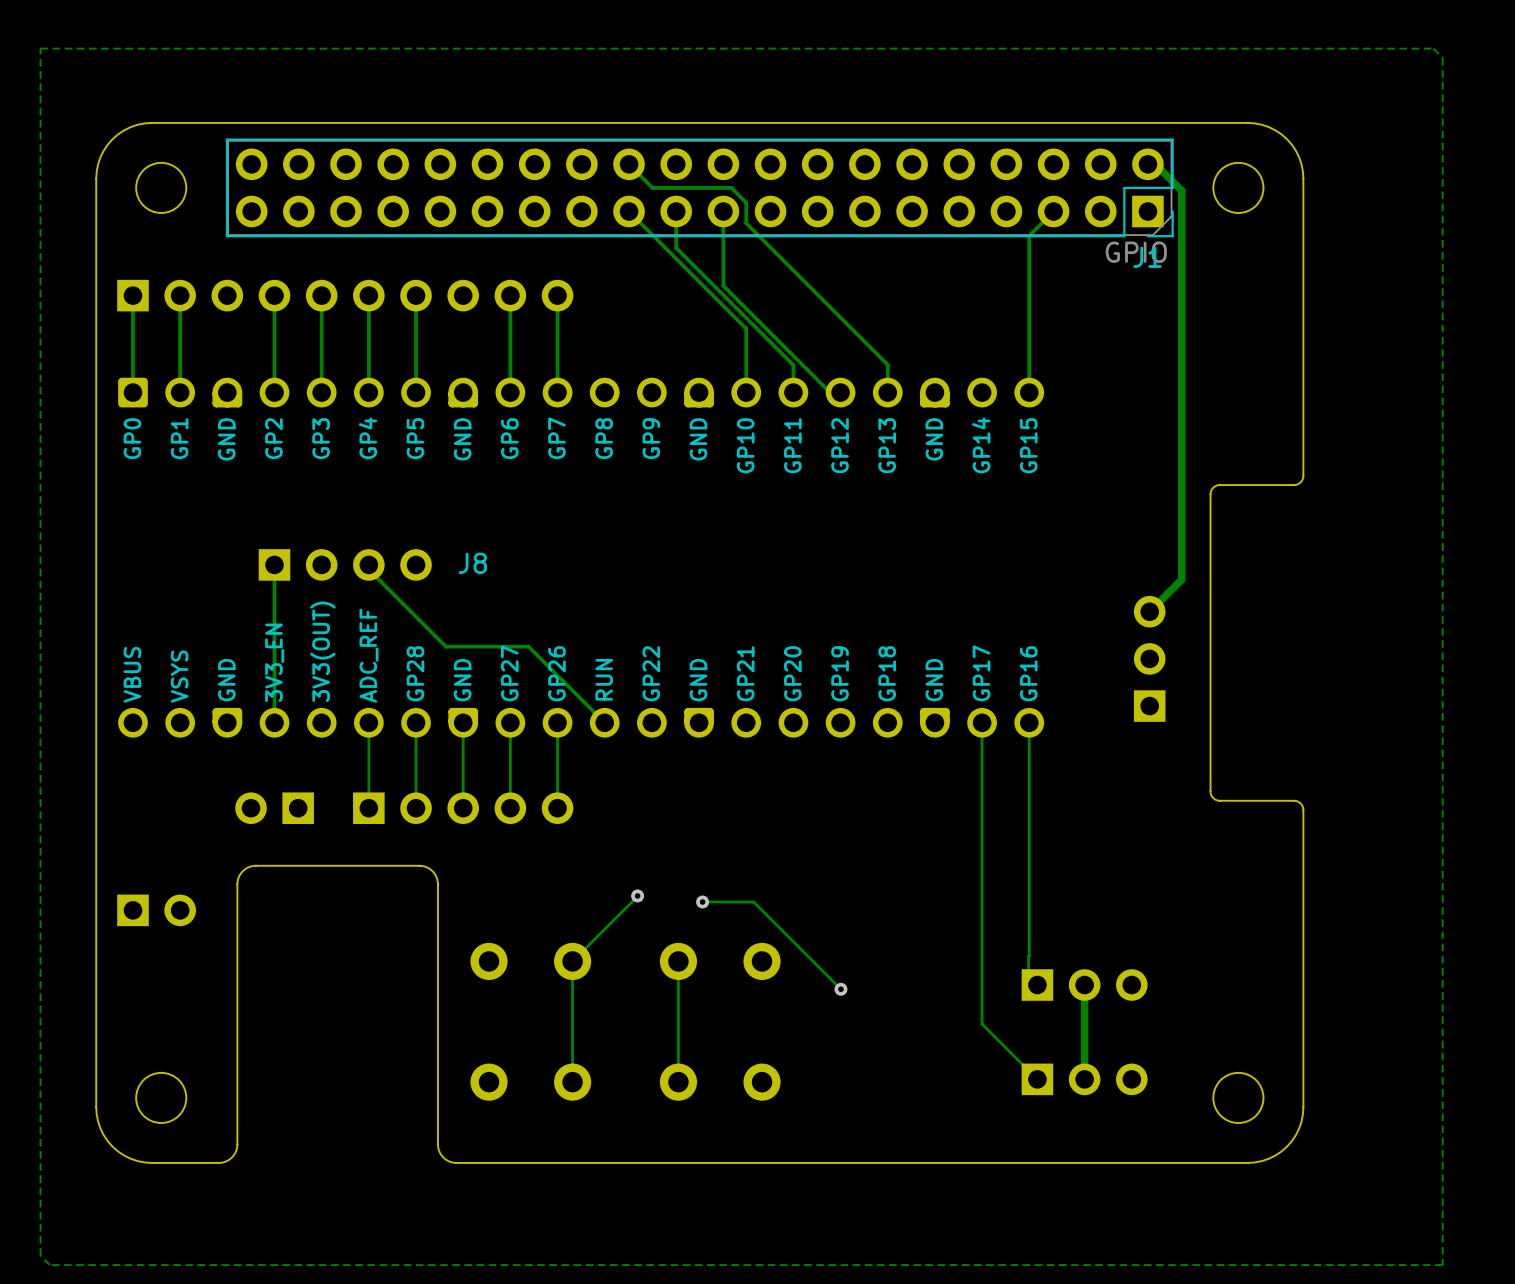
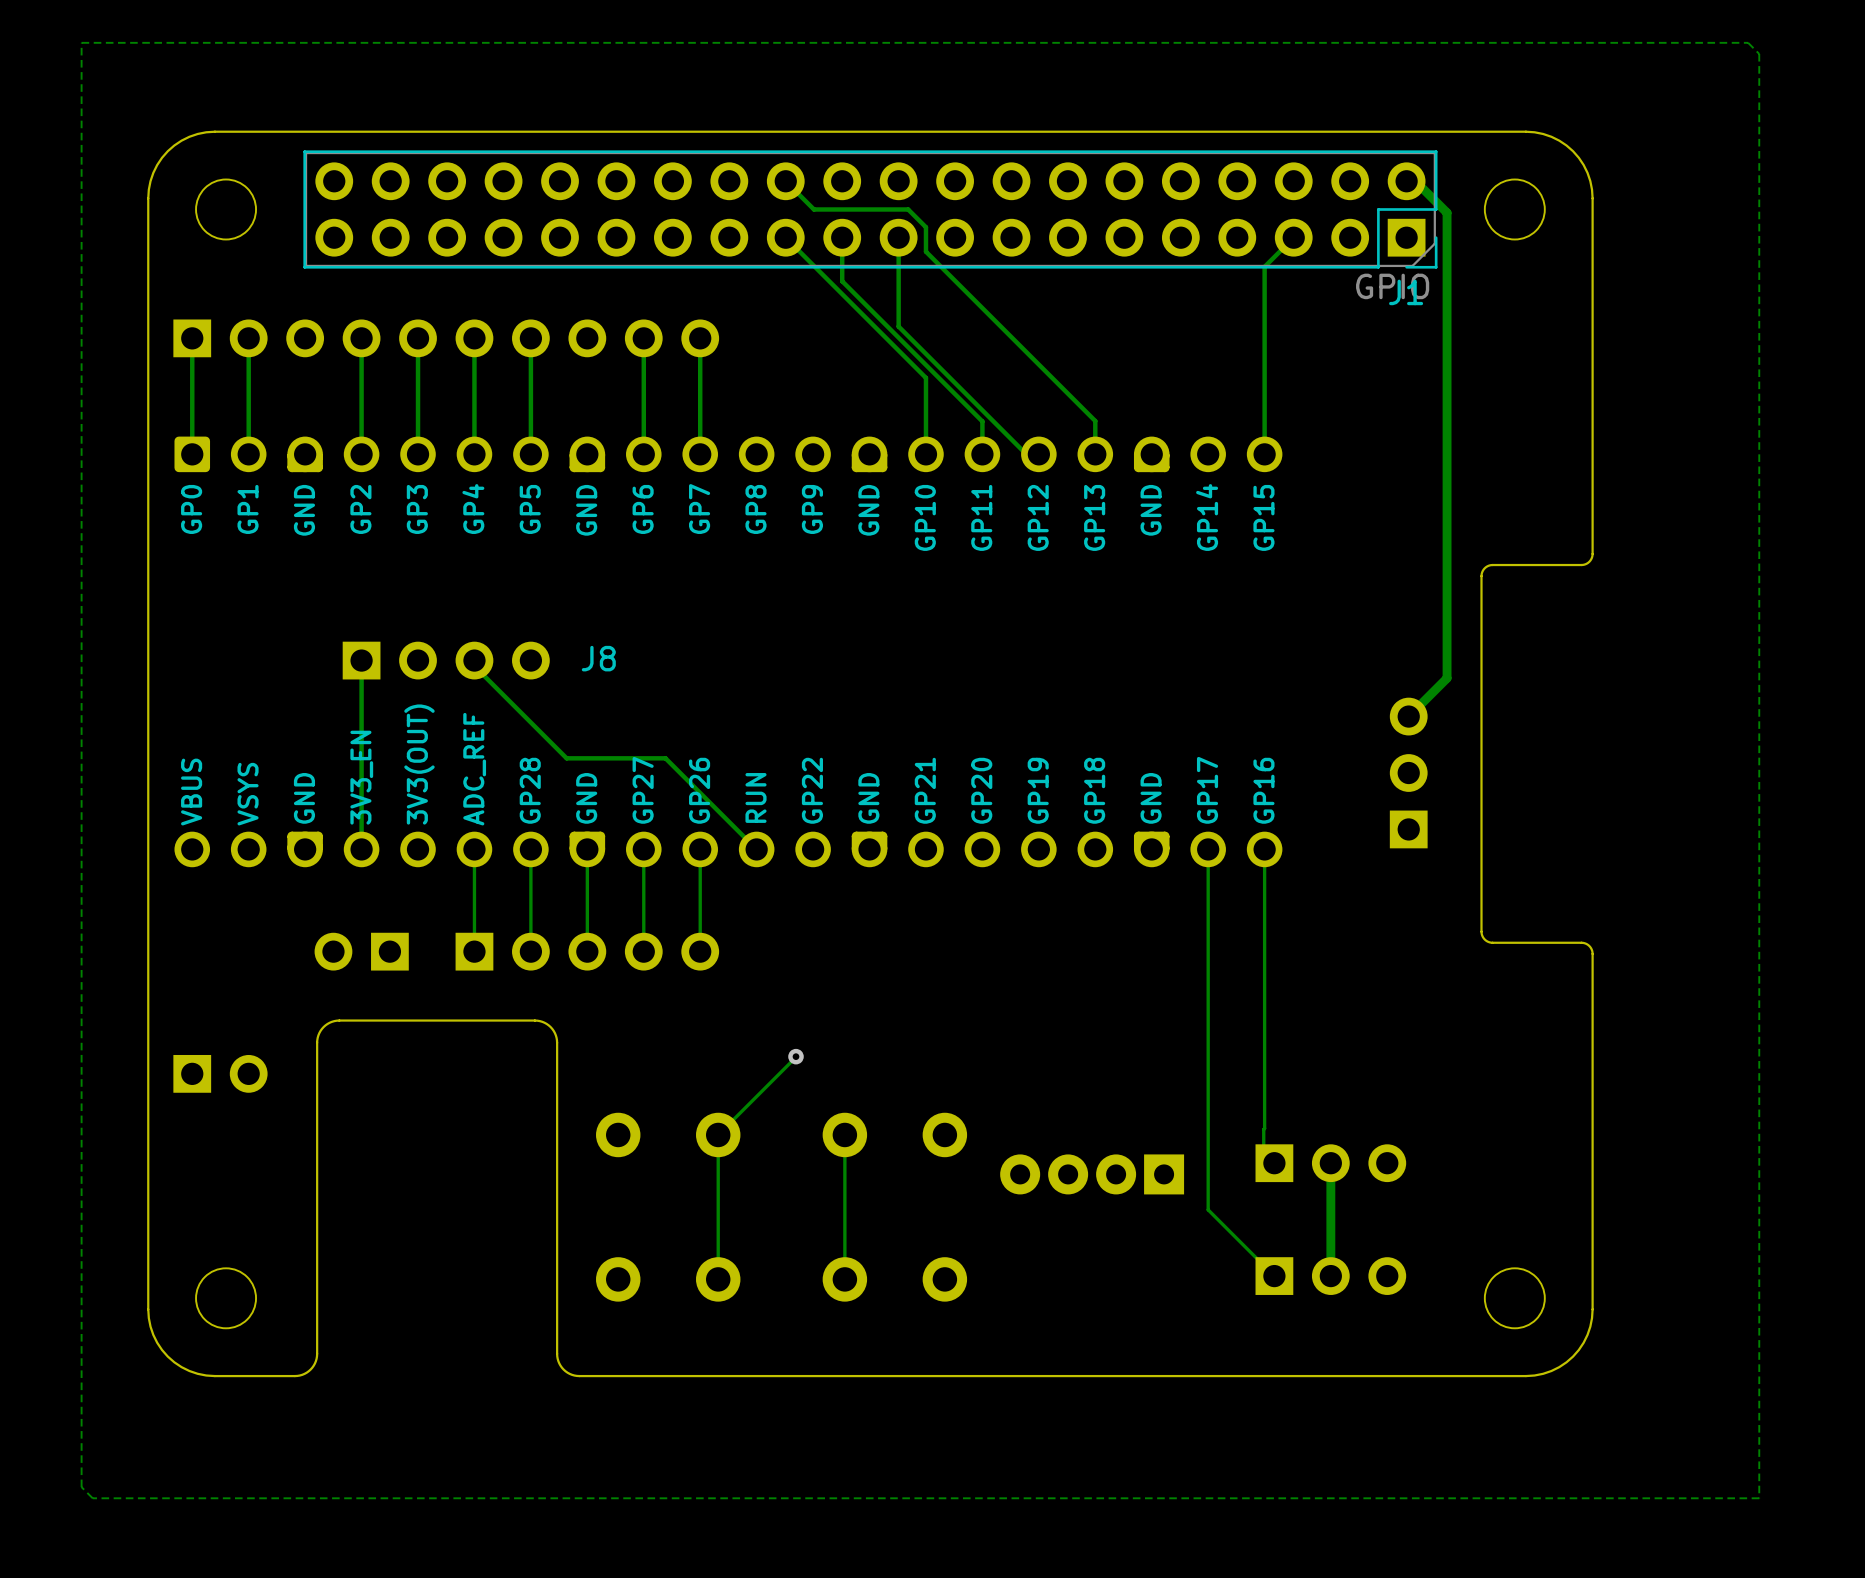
track: (702, 902) (753, 902) (840, 989) -> none
via: (702, 902) -> none
via: (840, 989) -> none
part: none -> (1092, 1174)

